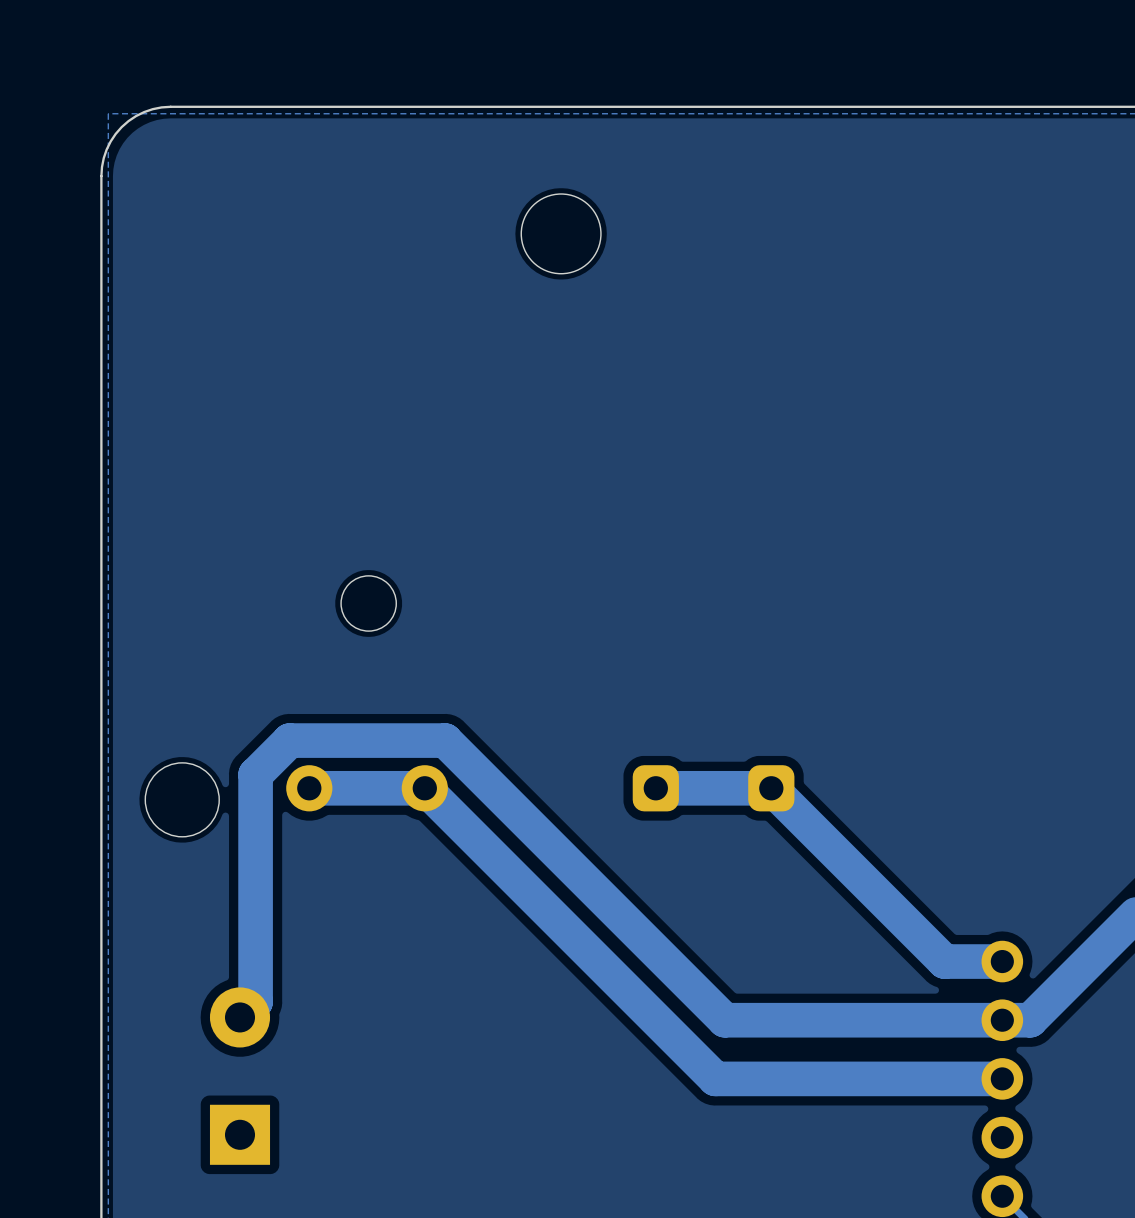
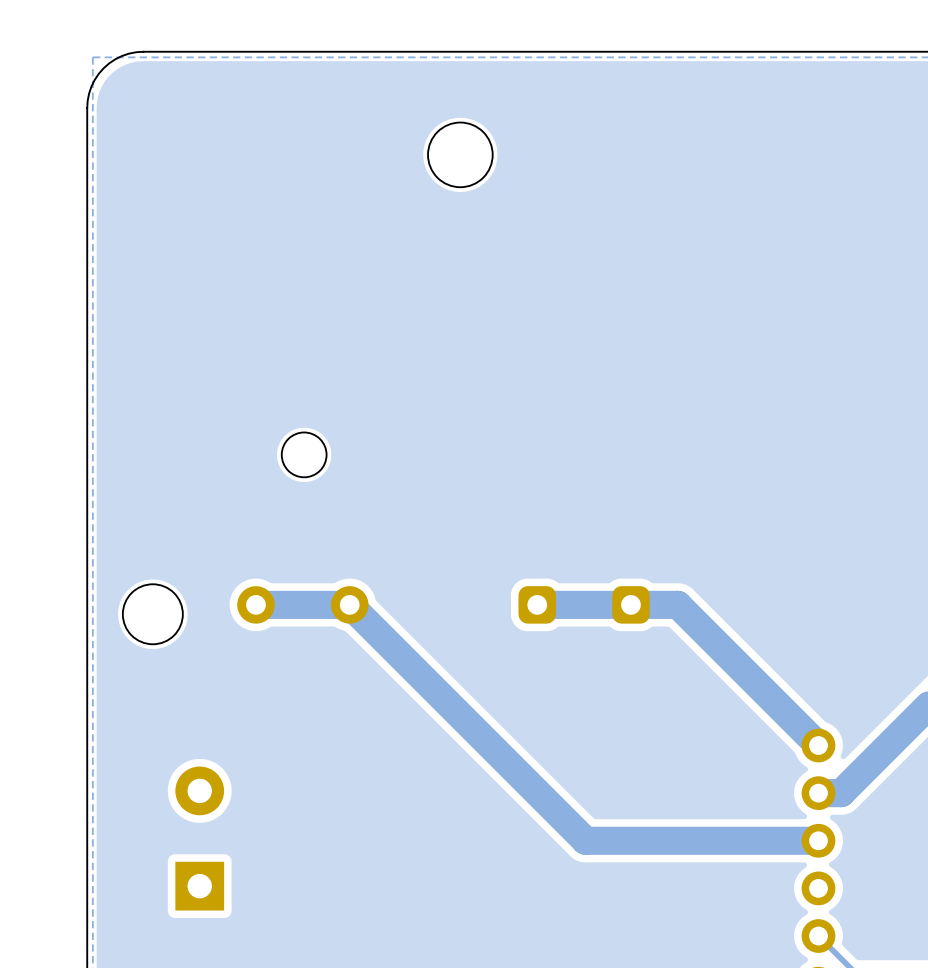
track: (771, 788) (944, 961) (1002, 961) -> (630, 604) (677, 604) (818, 745)
track: (240, 1017) (255, 1001) (255, 774) (289, 740) (445, 740) (724, 1020) (1002, 1020) -> none

